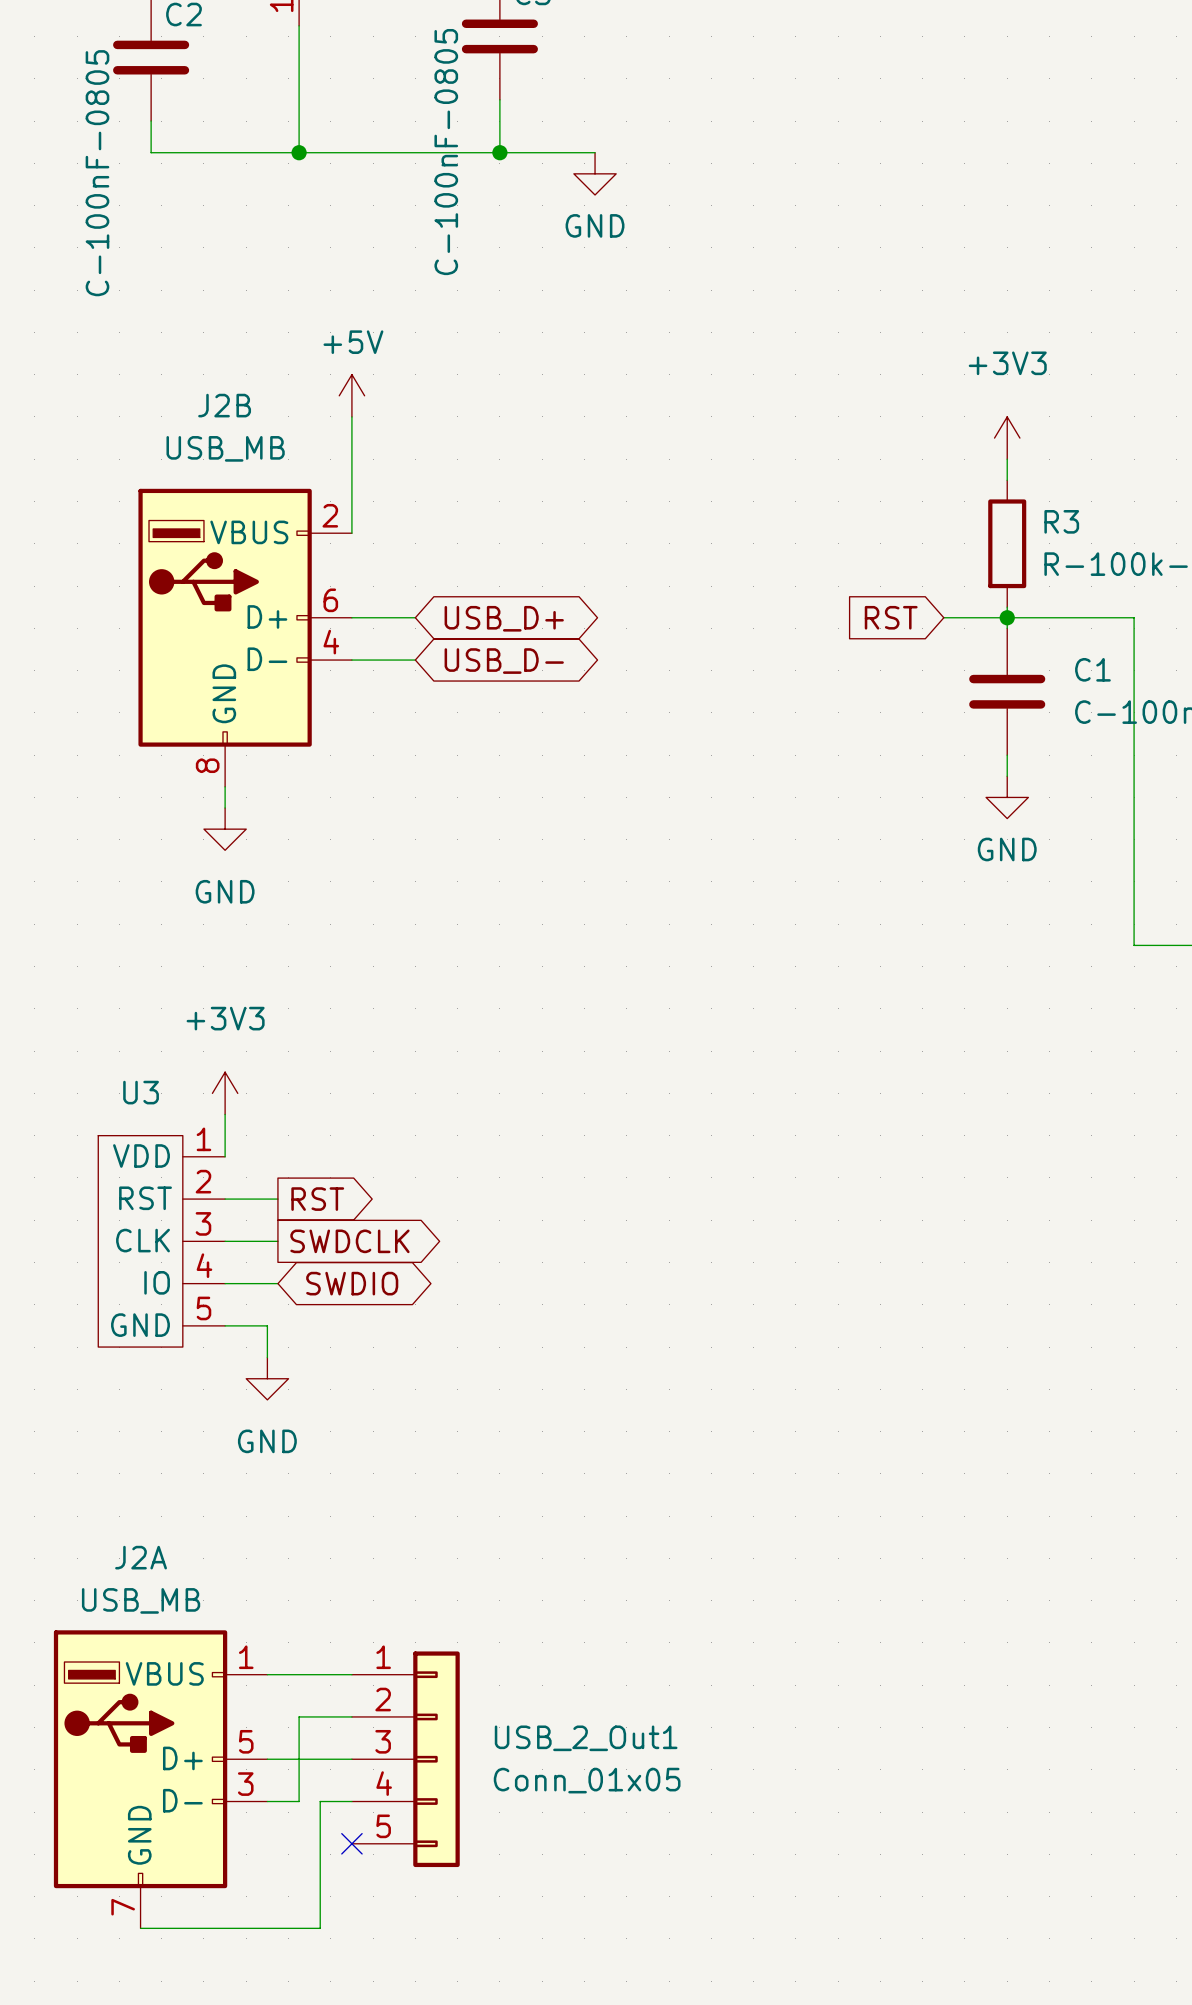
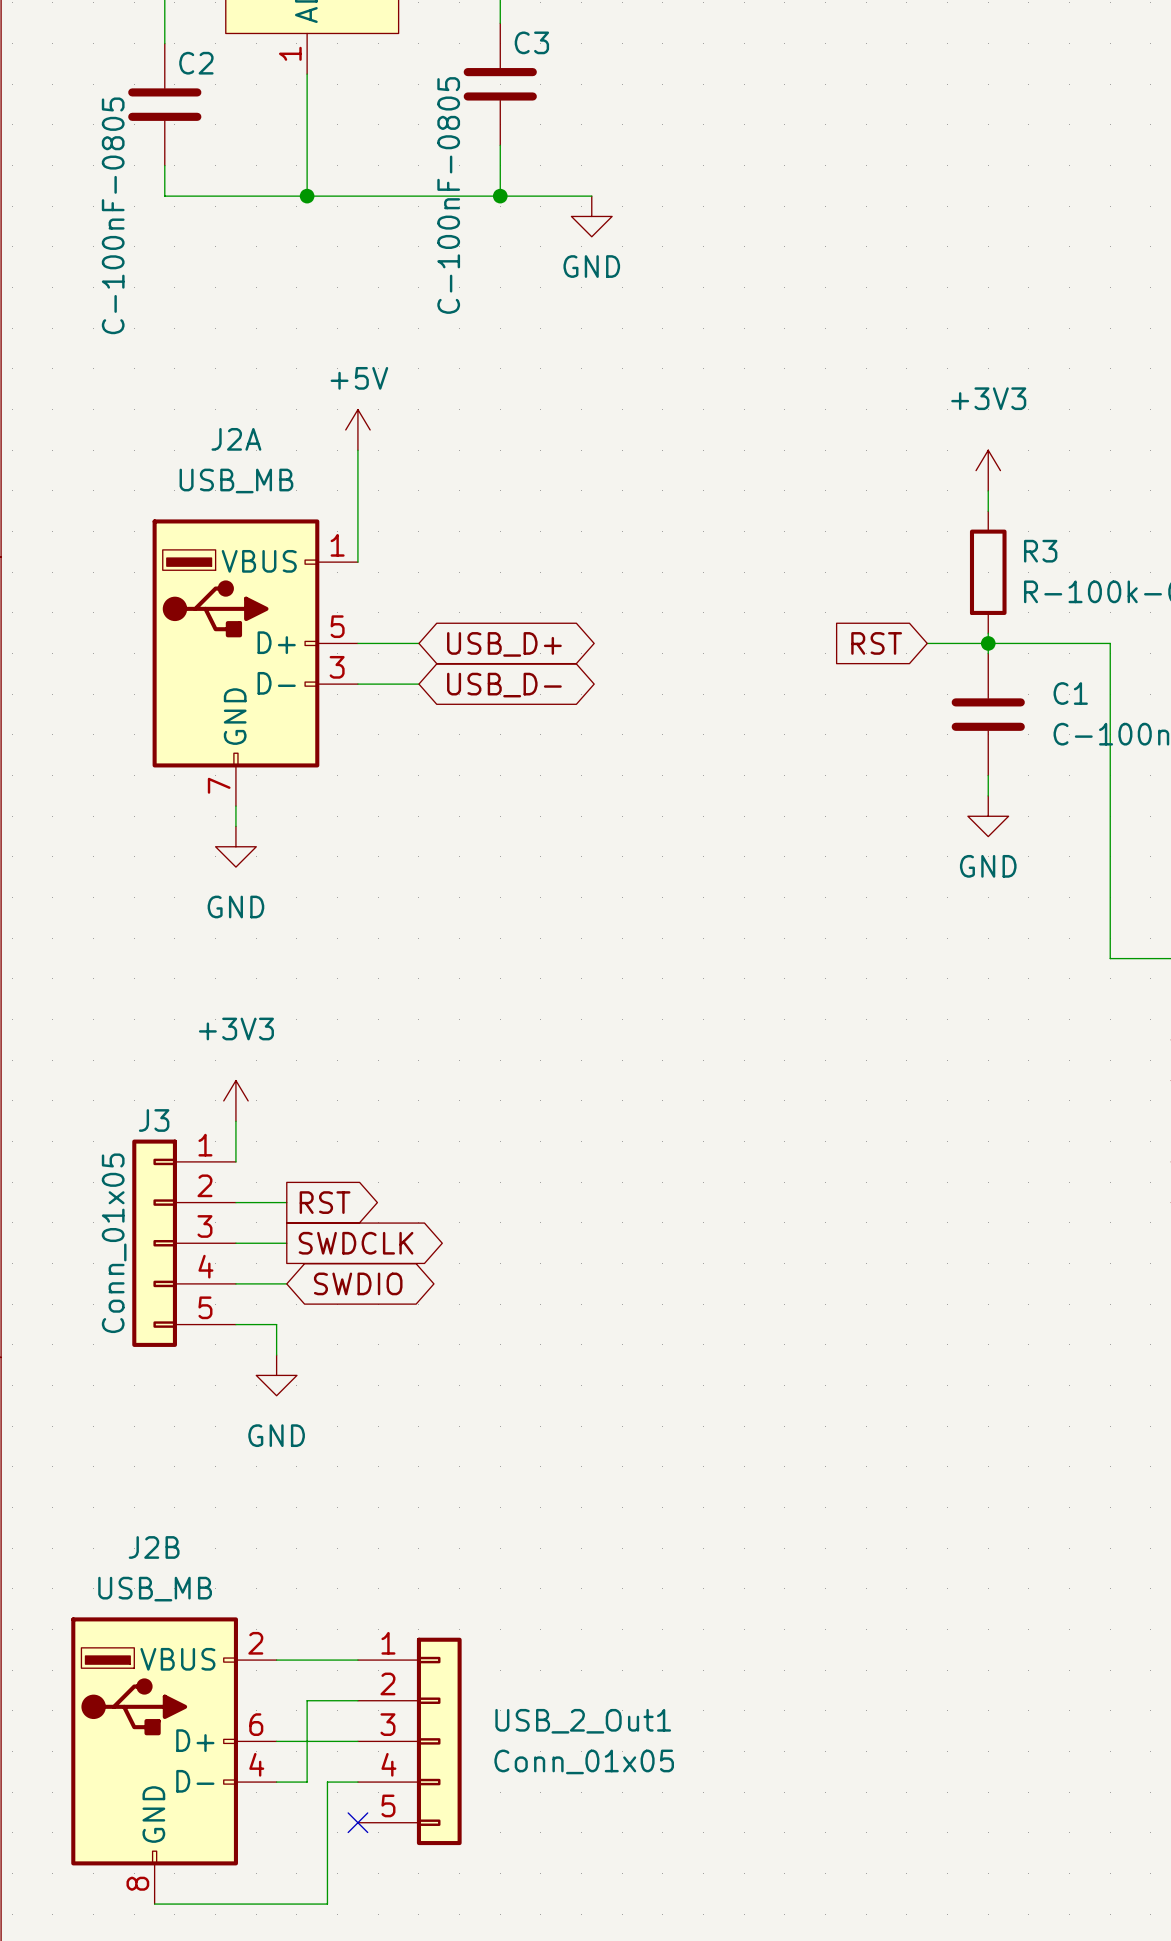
J2B name position: J2B (224, 405) -> J2B (154, 1547)
J2B position: (245, 637) -> (173, 1760)
U3: (161, 1241) -> none
J3: none -> Conn_01x05 (184, 1243)
J2A name position: J2A (141, 1557) -> J2A (236, 439)
J2A position: (160, 1779) -> (255, 662)

